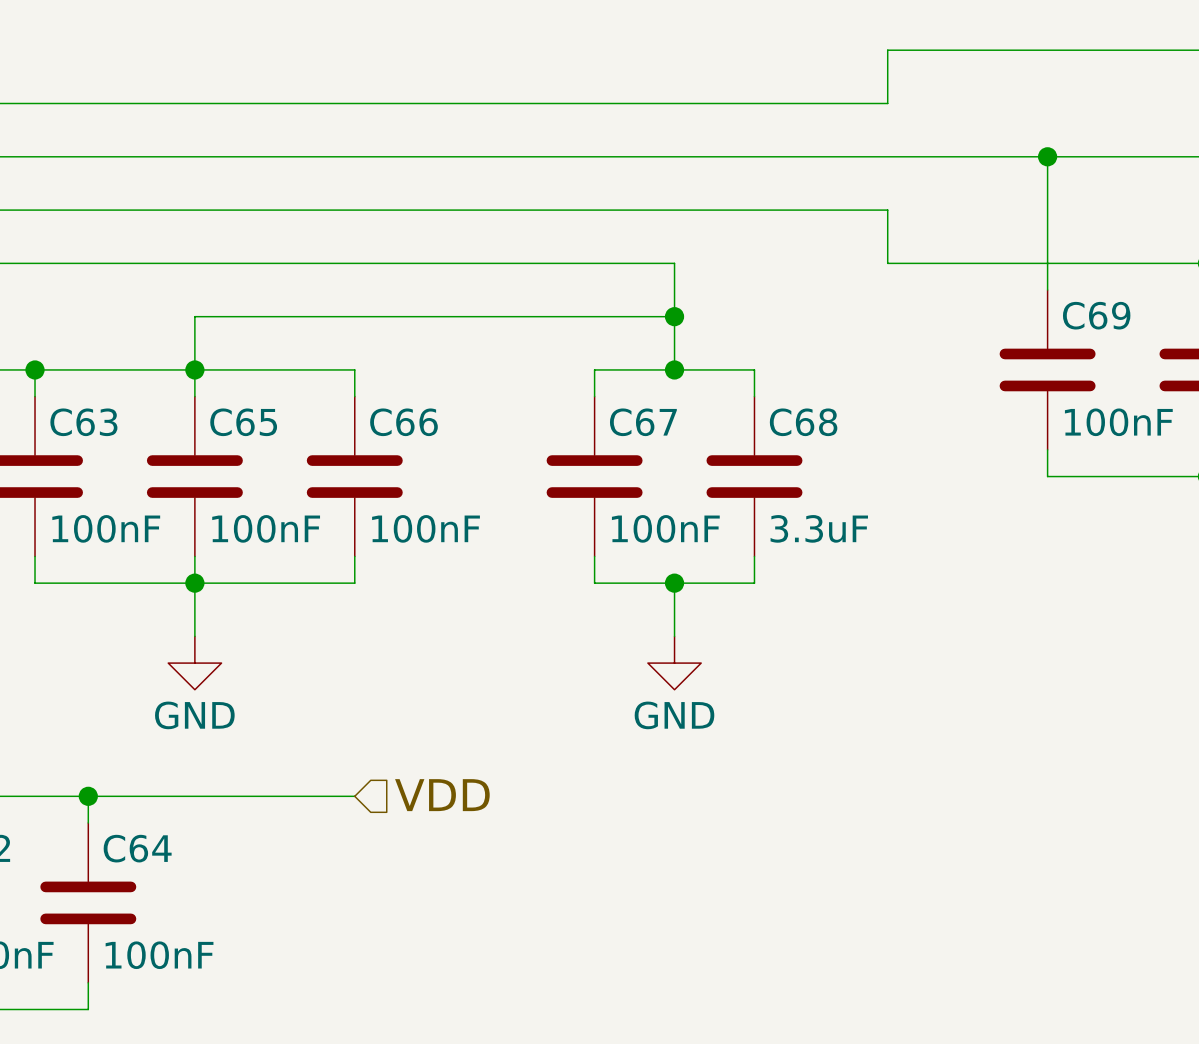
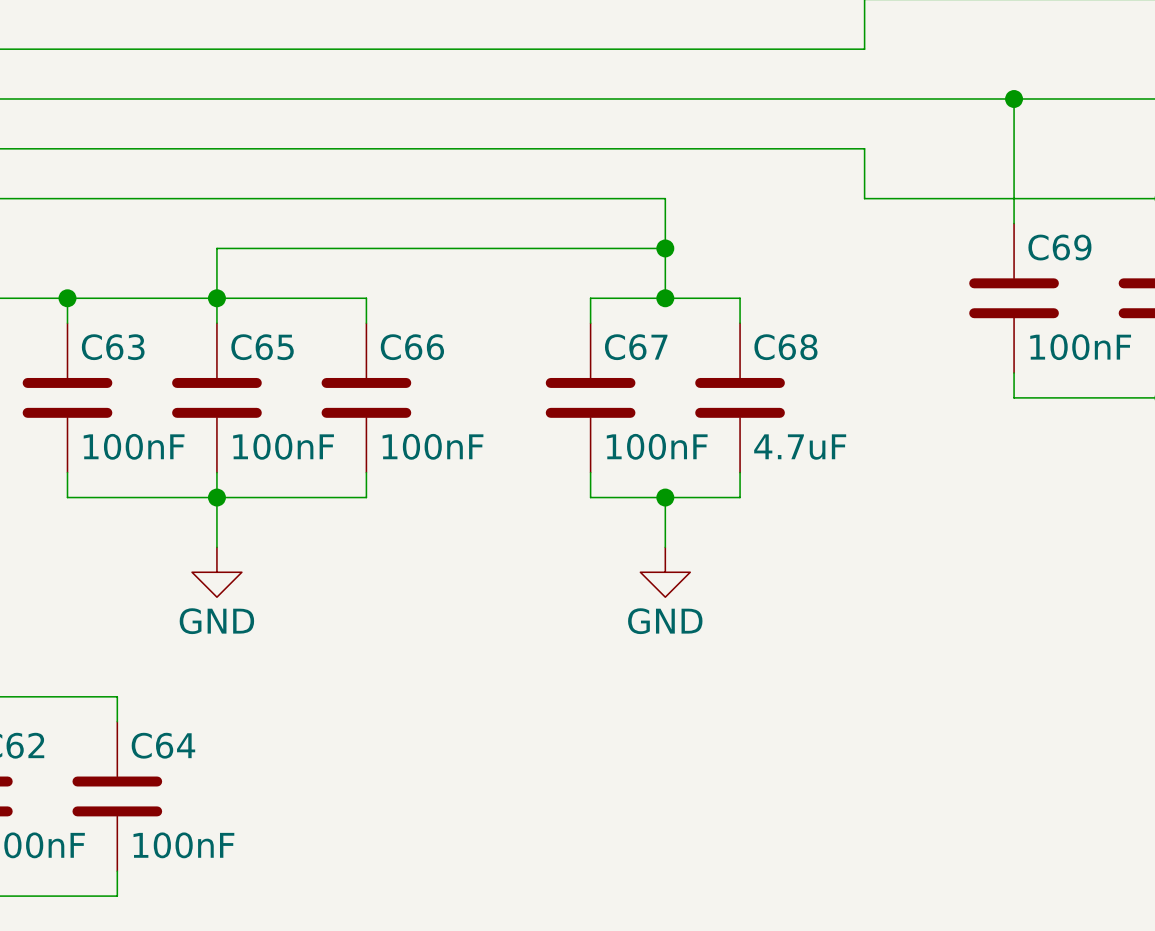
C68 value: 3.3uF (819, 528) -> 4.7uF (800, 447)
hierarchical label: VDD (442, 795) -> none
wire: (88, 796) (354, 796) -> none
junction: (88, 796) -> none

